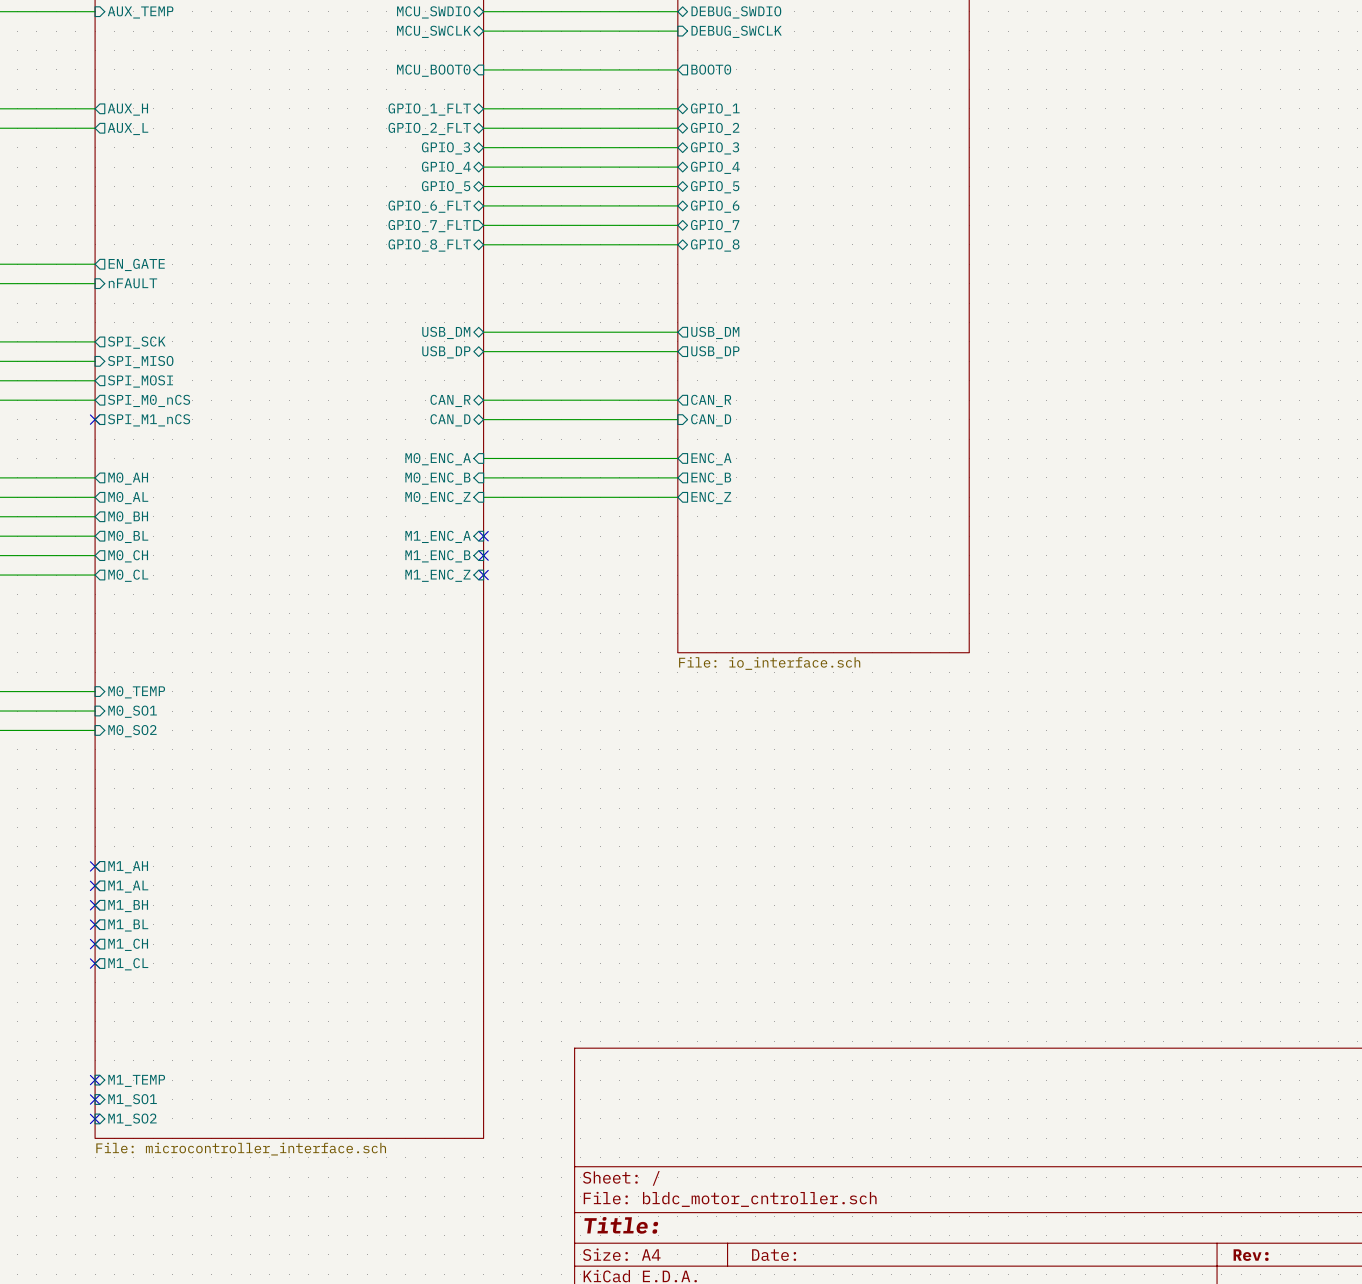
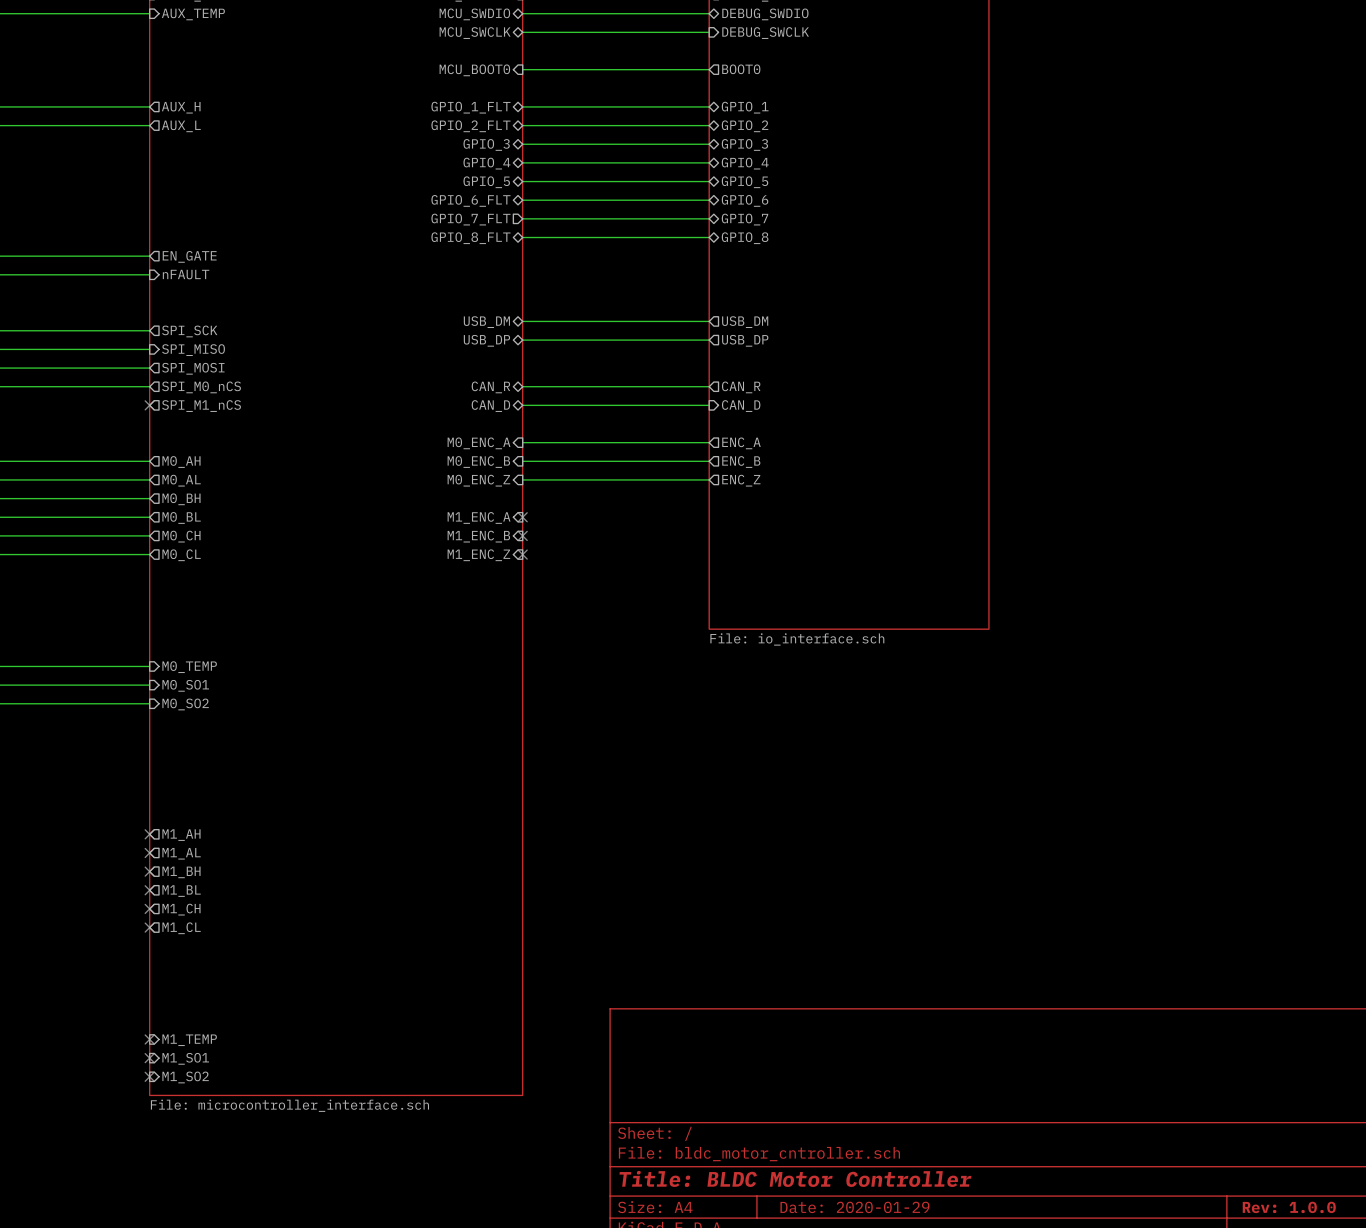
title block: Title: (621, 1225) -> Title: BLDC Motor Controller (795, 1178)
title block: Date: (774, 1255) -> Date: 2020-01-29 (854, 1207)
title block: Rev: (1251, 1255) -> Rev: 1.0.0 (1289, 1207)

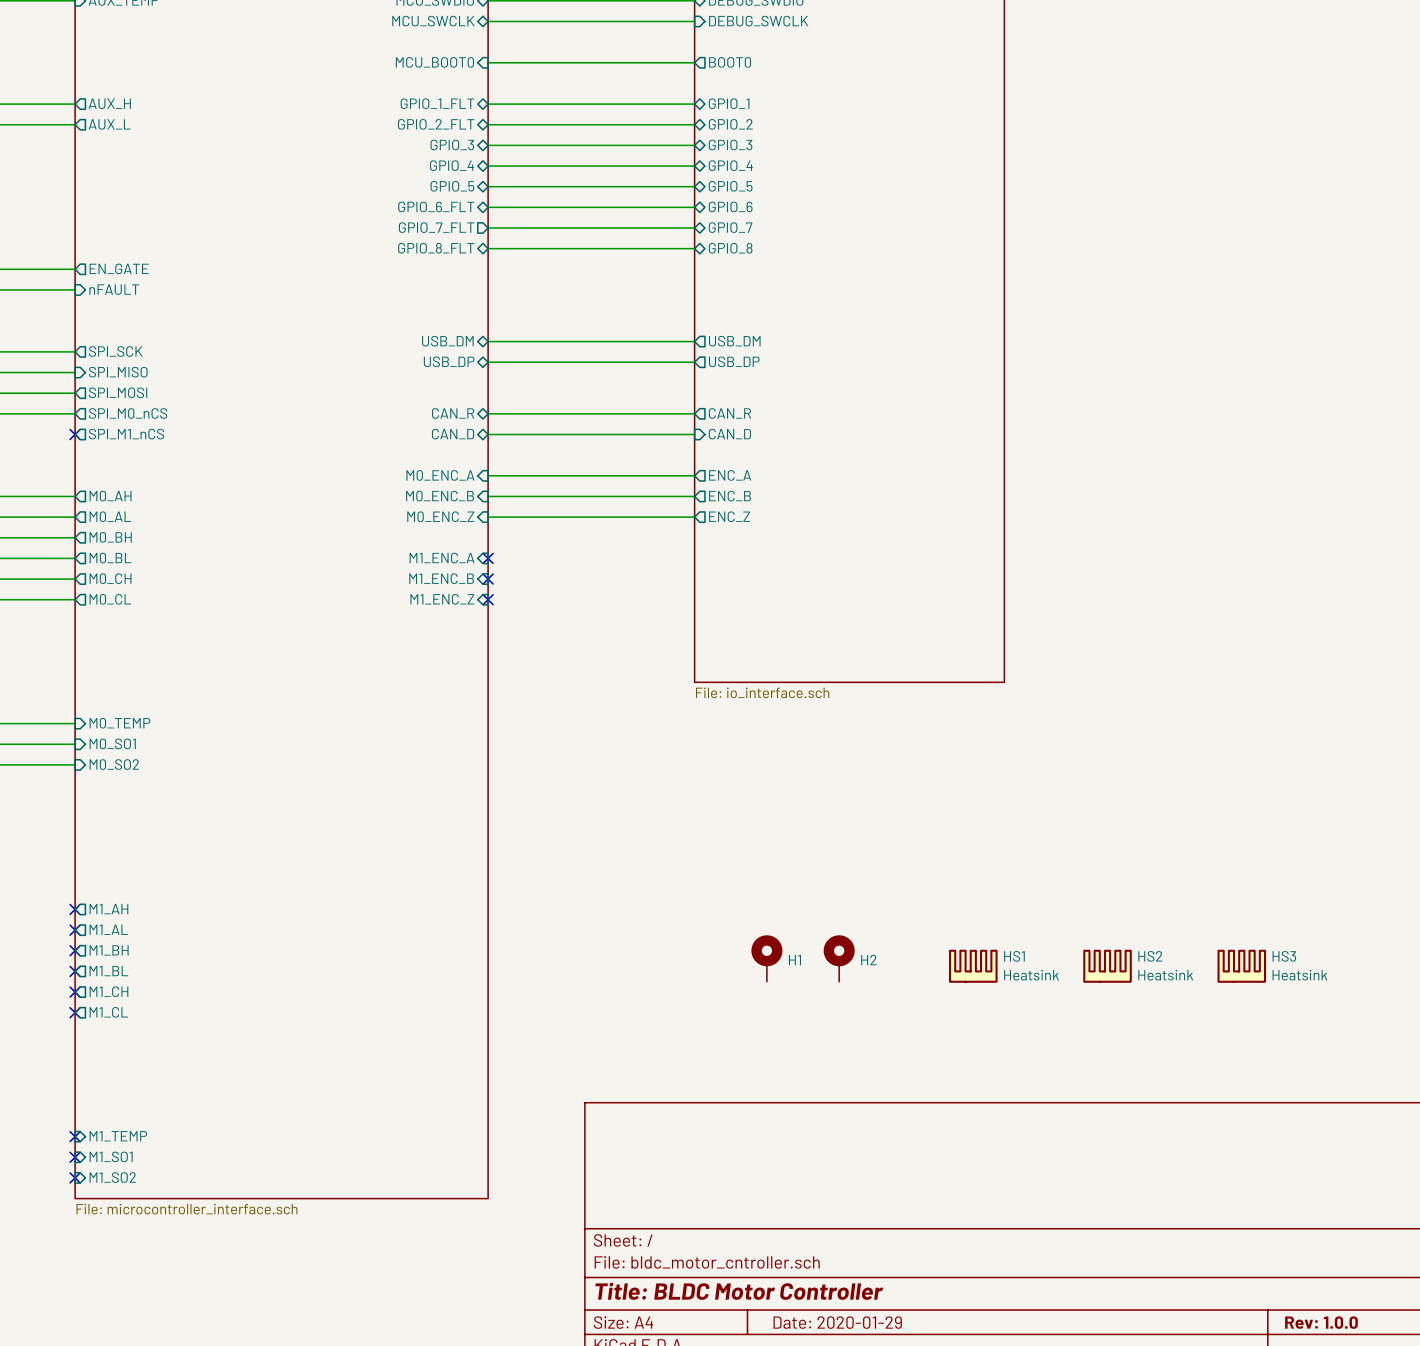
H1: none -> (766, 958)
H2: none -> (839, 958)
HS1: none -> Heatsink (973, 966)
HS2: none -> Heatsink (1107, 966)
HS3: none -> Heatsink (1241, 966)

